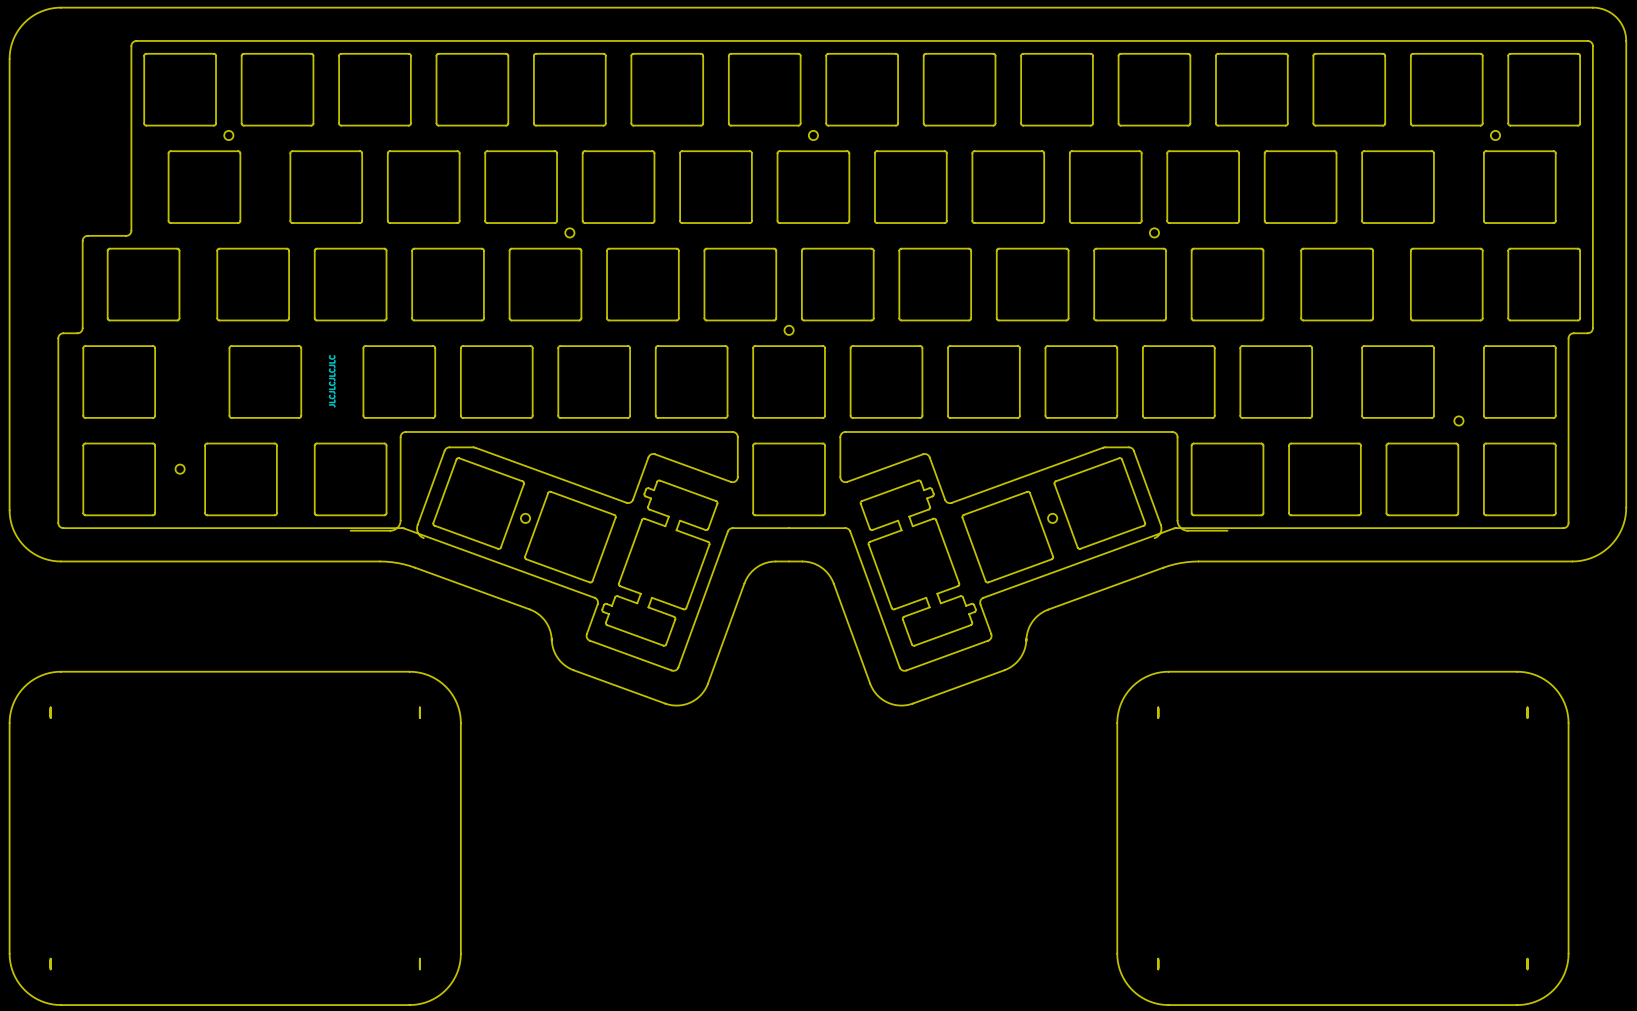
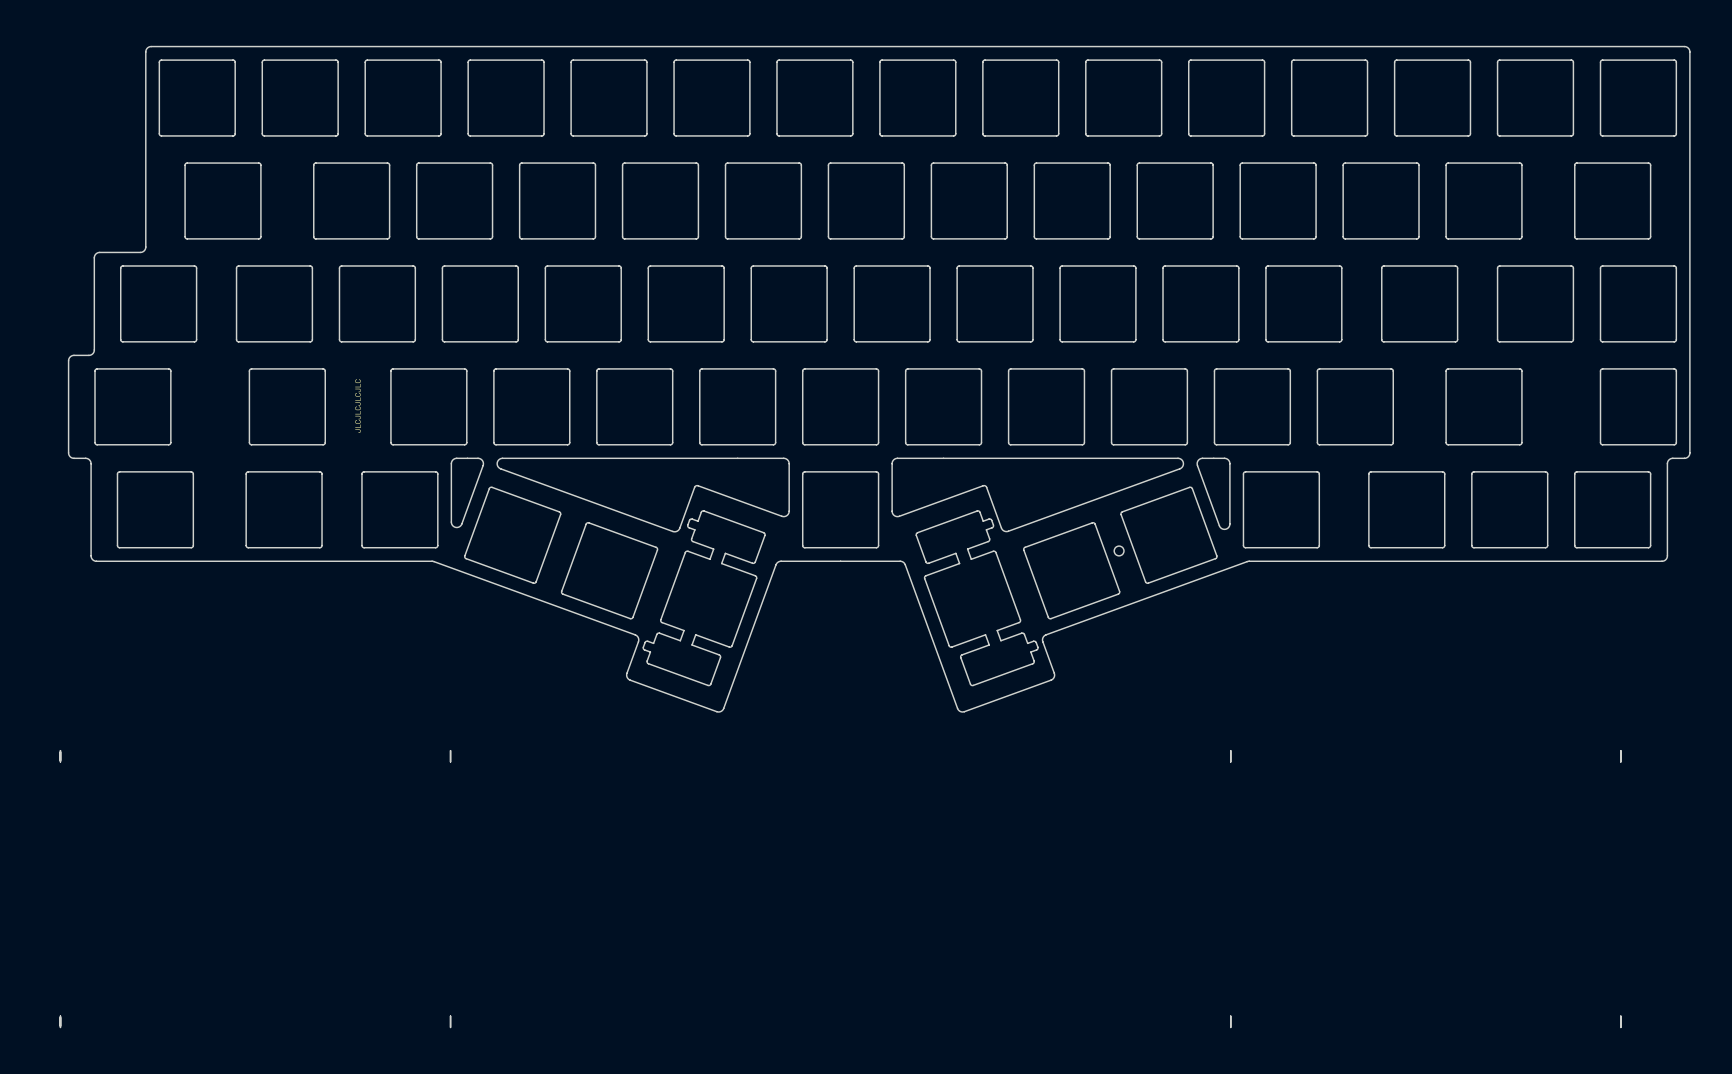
board edge: (60, 7) (1602, 9) (1614, 15) (1620, 22) (1626, 40) (1626, 507) (1623, 524) (1615, 539) (1607, 548) (1593, 557) (1576, 561) (1198, 561) (1174, 564) (1045, 610) (1036, 616) (1030, 624) (1023, 652) (1018, 660) (1010, 667) (903, 705) (884, 700) (872, 689) (832, 580) (821, 567) (809, 562) (769, 562) (759, 565) (751, 571) (744, 583) (705, 689) (693, 700) (678, 705) (665, 703) (567, 667) (559, 660) (554, 652) (547, 624) (541, 616) (532, 610) (403, 564) (379, 561) (60, 561) (45, 558) (30, 551) (21, 543) (13, 529) (9, 514) (9, 58) (13, 39) (24, 22) (41, 11) (60, 7) -> none
part: (228, 135) -> none
part: (813, 135) -> none
part: (1495, 135) -> none
part: (569, 232) -> none
part: (1154, 232) -> none
board edge: (1592, 328) (1589, 332) (1572, 333) (1568, 337) (1568, 523) (1567, 526) (1563, 528) -> (1689, 349) (1689, 453) (1686, 458) (1671, 458) (1667, 461) (1667, 556) (1664, 560) (1658, 561)
part: (789, 330) -> none
drawing position: (1519, 381) -> (1638, 406)
part: (1458, 420) -> none
board edge: (58, 425) (58, 524) (62, 528) (84, 528) -> (68, 452) (71, 457) (86, 458) (90, 462) (91, 556) (96, 561)
board edge: none -> (456, 458) (479, 458) (483, 463) (461, 523) (456, 527) (451, 522) (451, 463) (452, 459) (456, 458)
board edge: none -> (502, 458) (784, 458) (789, 463) (789, 512) (786, 515) (782, 516) (696, 485) (679, 528) (673, 531) (500, 468) (497, 462) (502, 458)
board edge: none -> (897, 458) (1178, 458) (1181, 459) (1183, 464) (1179, 468) (1006, 531) (1001, 528) (984, 485) (899, 516) (894, 515) (892, 511) (892, 463) (893, 459) (897, 458)
board edge: none -> (1202, 458) (1225, 458) (1229, 461) (1229, 523) (1226, 529) (1219, 526) (1197, 465) (1198, 460) (1202, 458)
part: (180, 469) -> none
drawing position: (119, 479) -> (155, 509)
drawing position: (241, 479) -> (284, 509)
drawing position: (350, 479) -> (399, 509)
drawing position: (1227, 479) -> (1281, 509)
part: (525, 518) -> none
board edge: (350, 530) (391, 530) (399, 524) (400, 437) (404, 432) (732, 431) (737, 435) (737, 477) (735, 481) (730, 481) (652, 454) (648, 457) (632, 500) (628, 503) (474, 447) (447, 447) (444, 450) (417, 526) (418, 532) (423, 538) -> none
board edge: (1227, 530) (1186, 530) (1178, 524) (1177, 437) (1173, 432) (845, 431) (840, 435) (840, 477) (842, 481) (847, 481) (925, 454) (929, 457) (945, 500) (949, 503) (1103, 447) (1130, 447) (1133, 450) (1161, 526) (1160, 532) (1154, 538) -> none
board edge: (60, 671) (409, 671) (429, 675) (442, 684) (456, 703) (460, 723) (460, 957) (456, 973) (448, 987) (432, 999) (409, 1005) (60, 1005) (45, 1002) (27, 992) (15, 977) (9, 957) (9, 718) (15, 699) (24, 686) (41, 675) (60, 671) -> none
board edge: (1168, 671) (1517, 671) (1536, 675) (1550, 684) (1564, 703) (1568, 723) (1568, 957) (1564, 973) (1556, 987) (1540, 999) (1517, 1005) (1168, 1005) (1152, 1002) (1135, 992) (1122, 977) (1117, 957) (1117, 718) (1122, 699) (1135, 684) (1148, 675) (1168, 671) -> none

